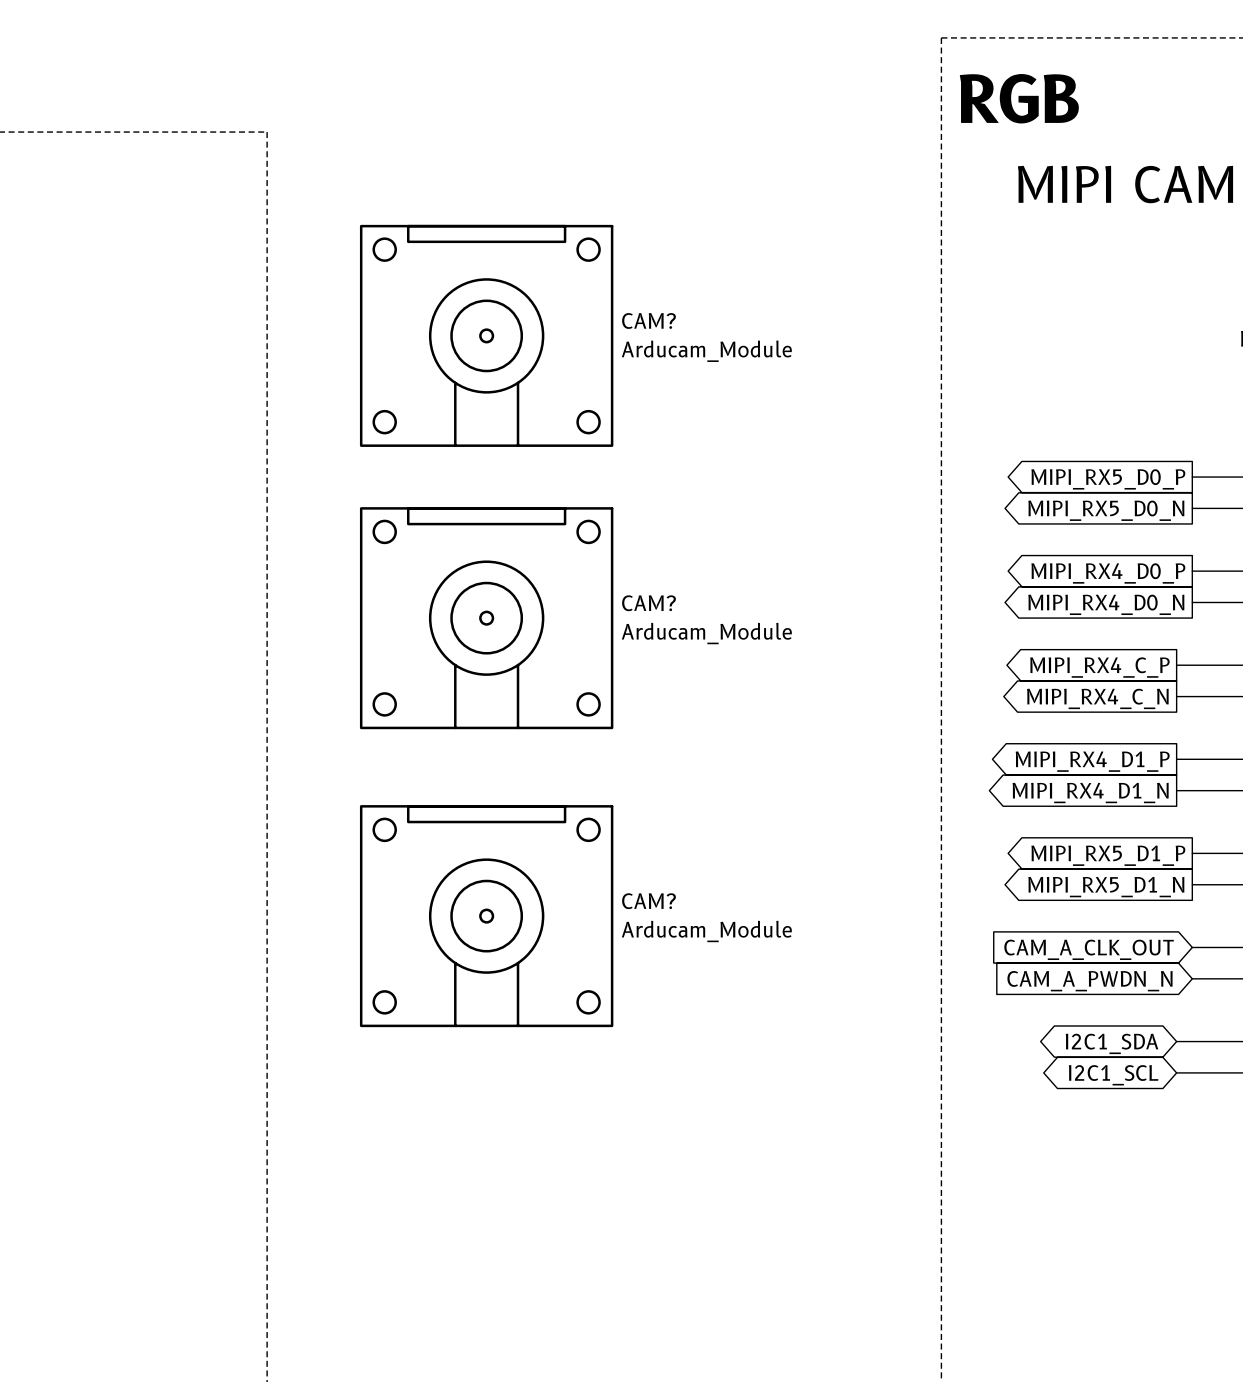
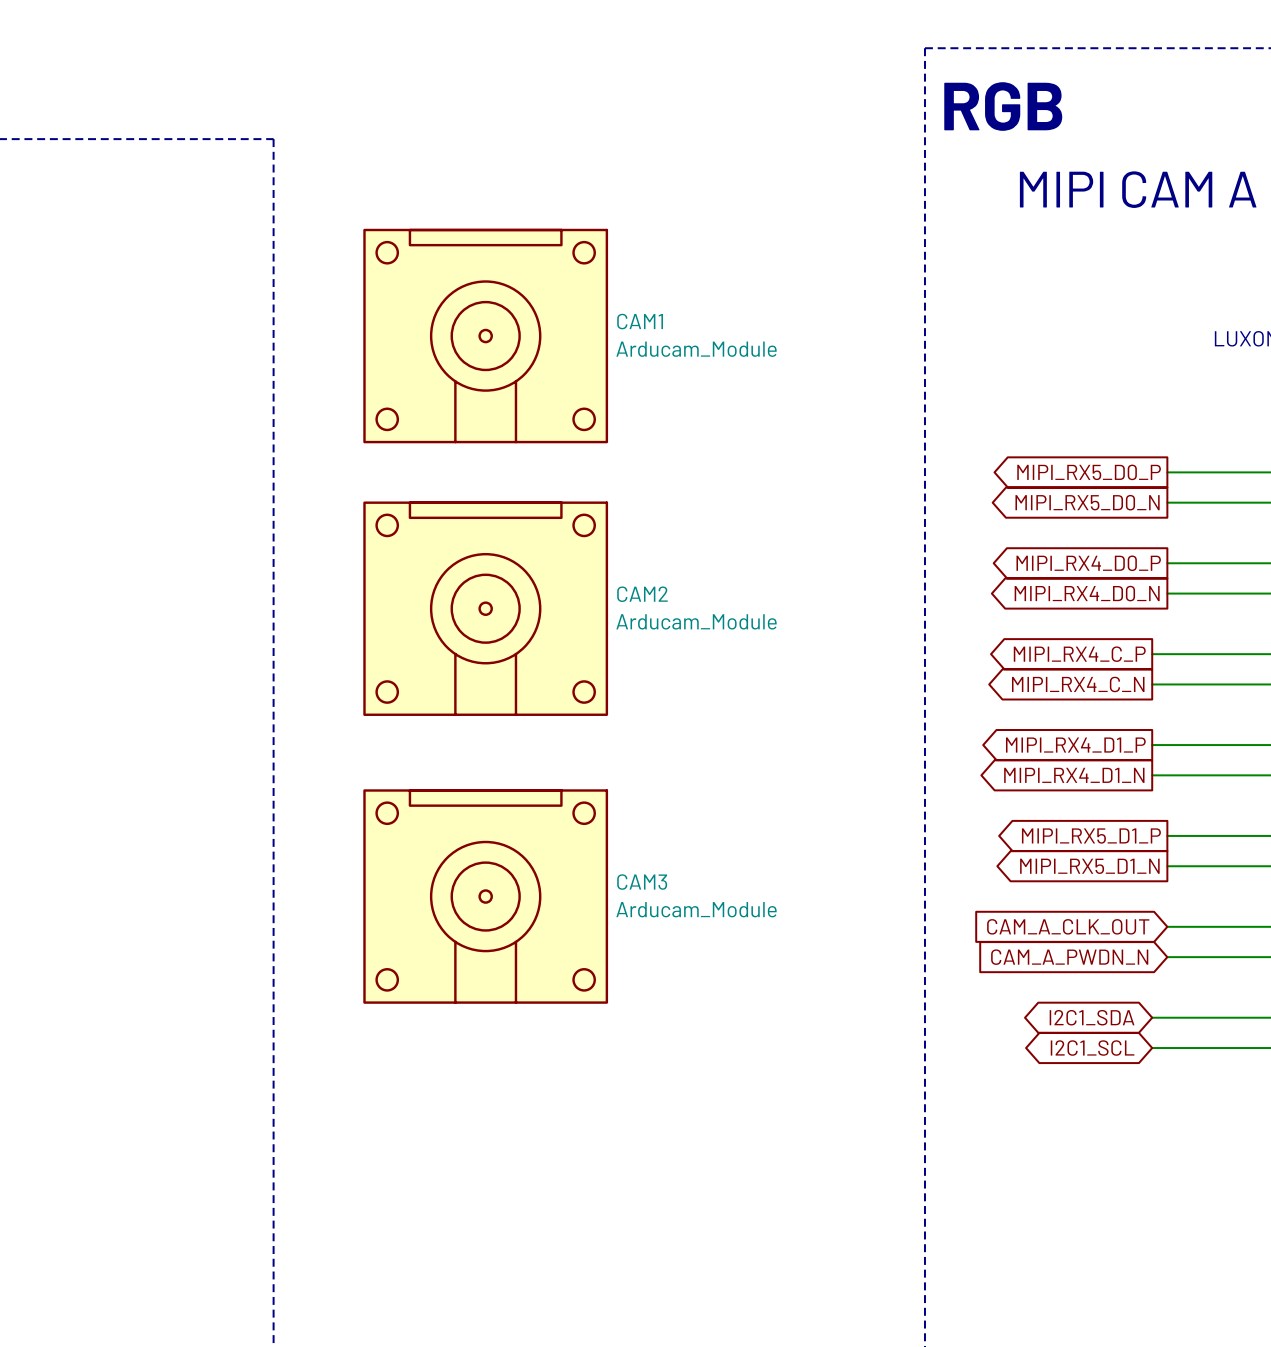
CAM? name: CAM? (649, 320) -> CAM1 (640, 321)
CAM? name: CAM? (649, 603) -> CAM2 (642, 594)
CAM? name: CAM? (649, 901) -> CAM3 (642, 882)

